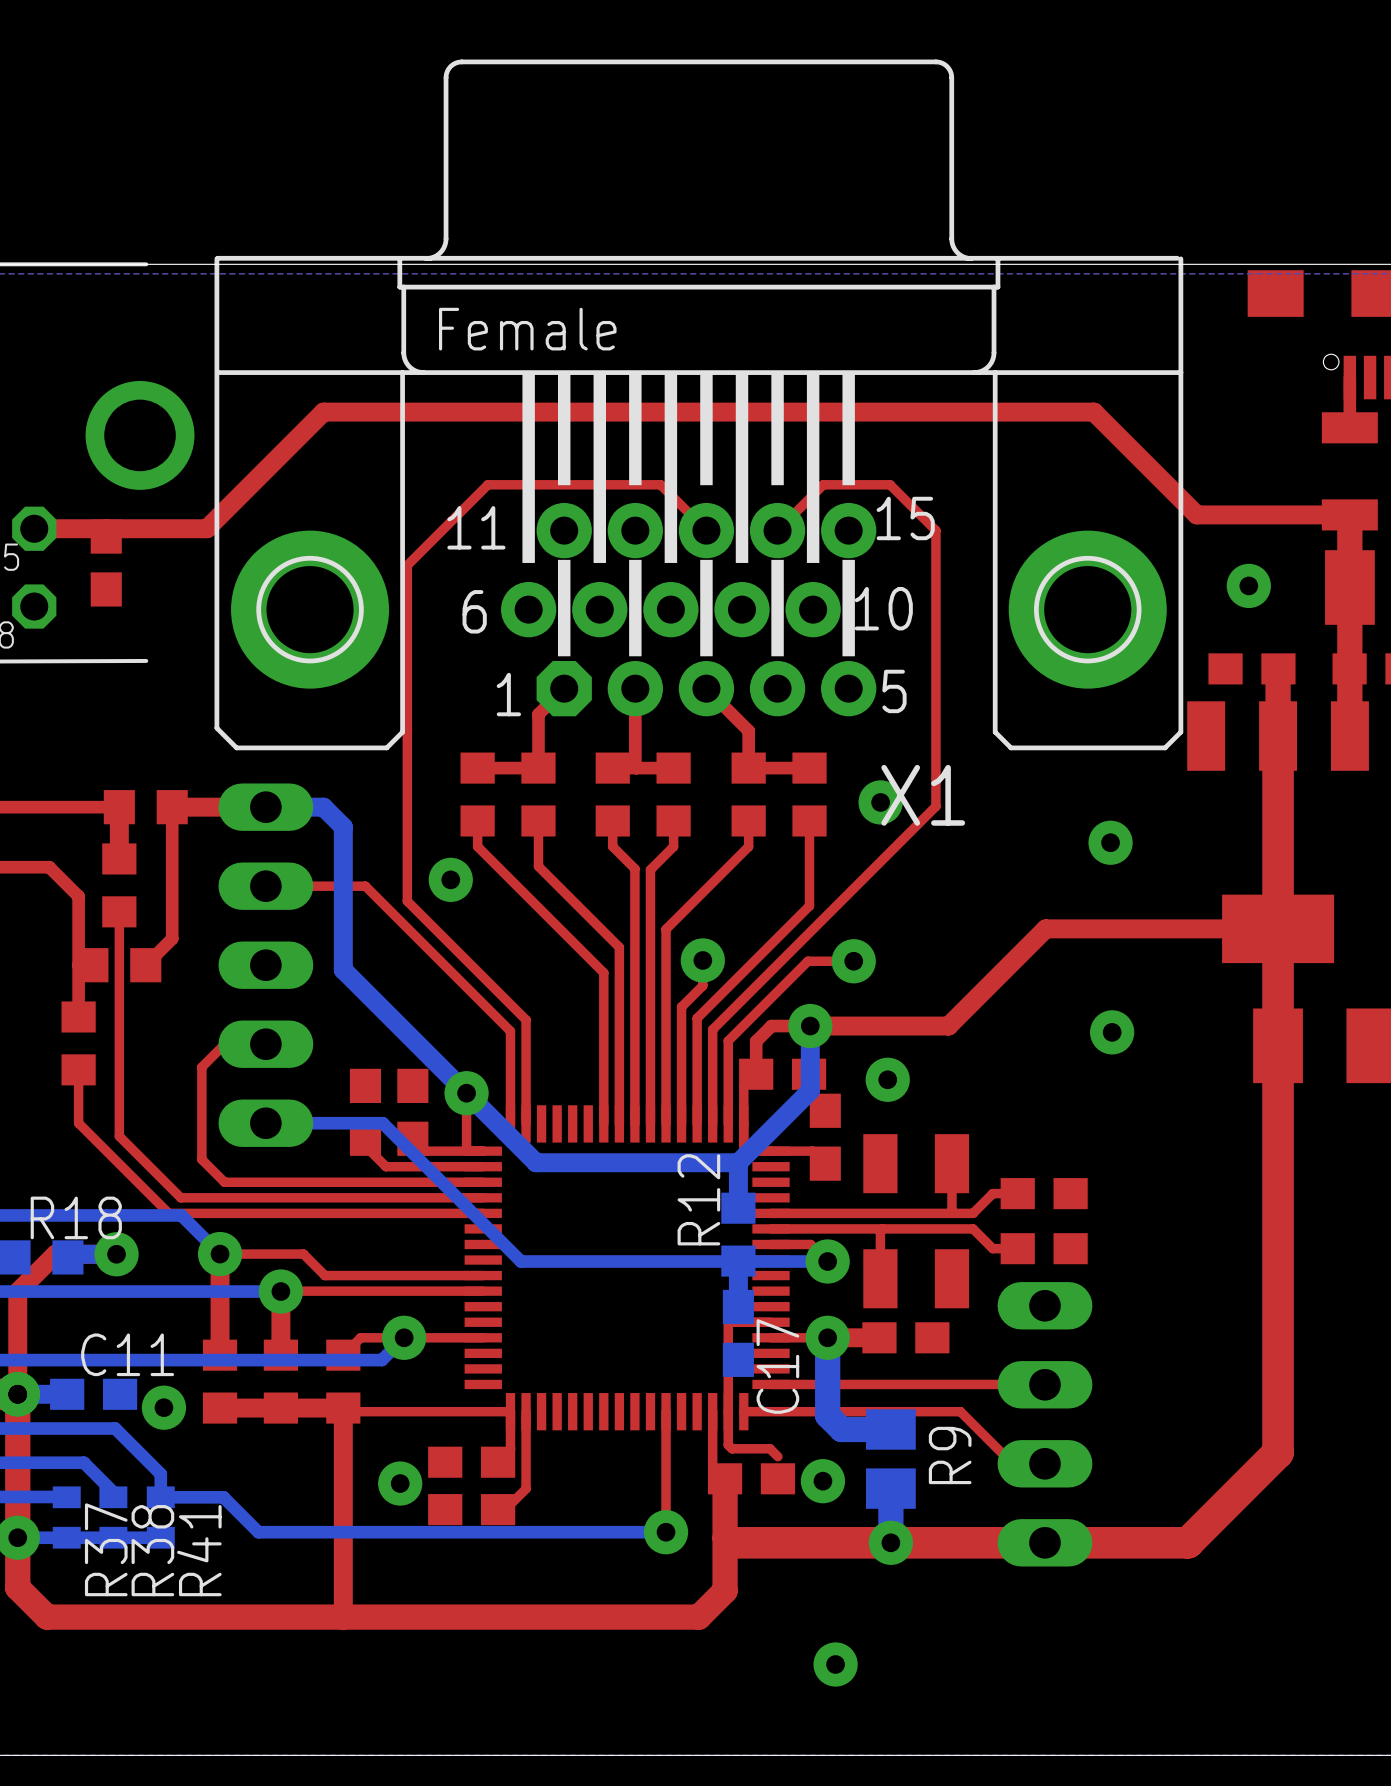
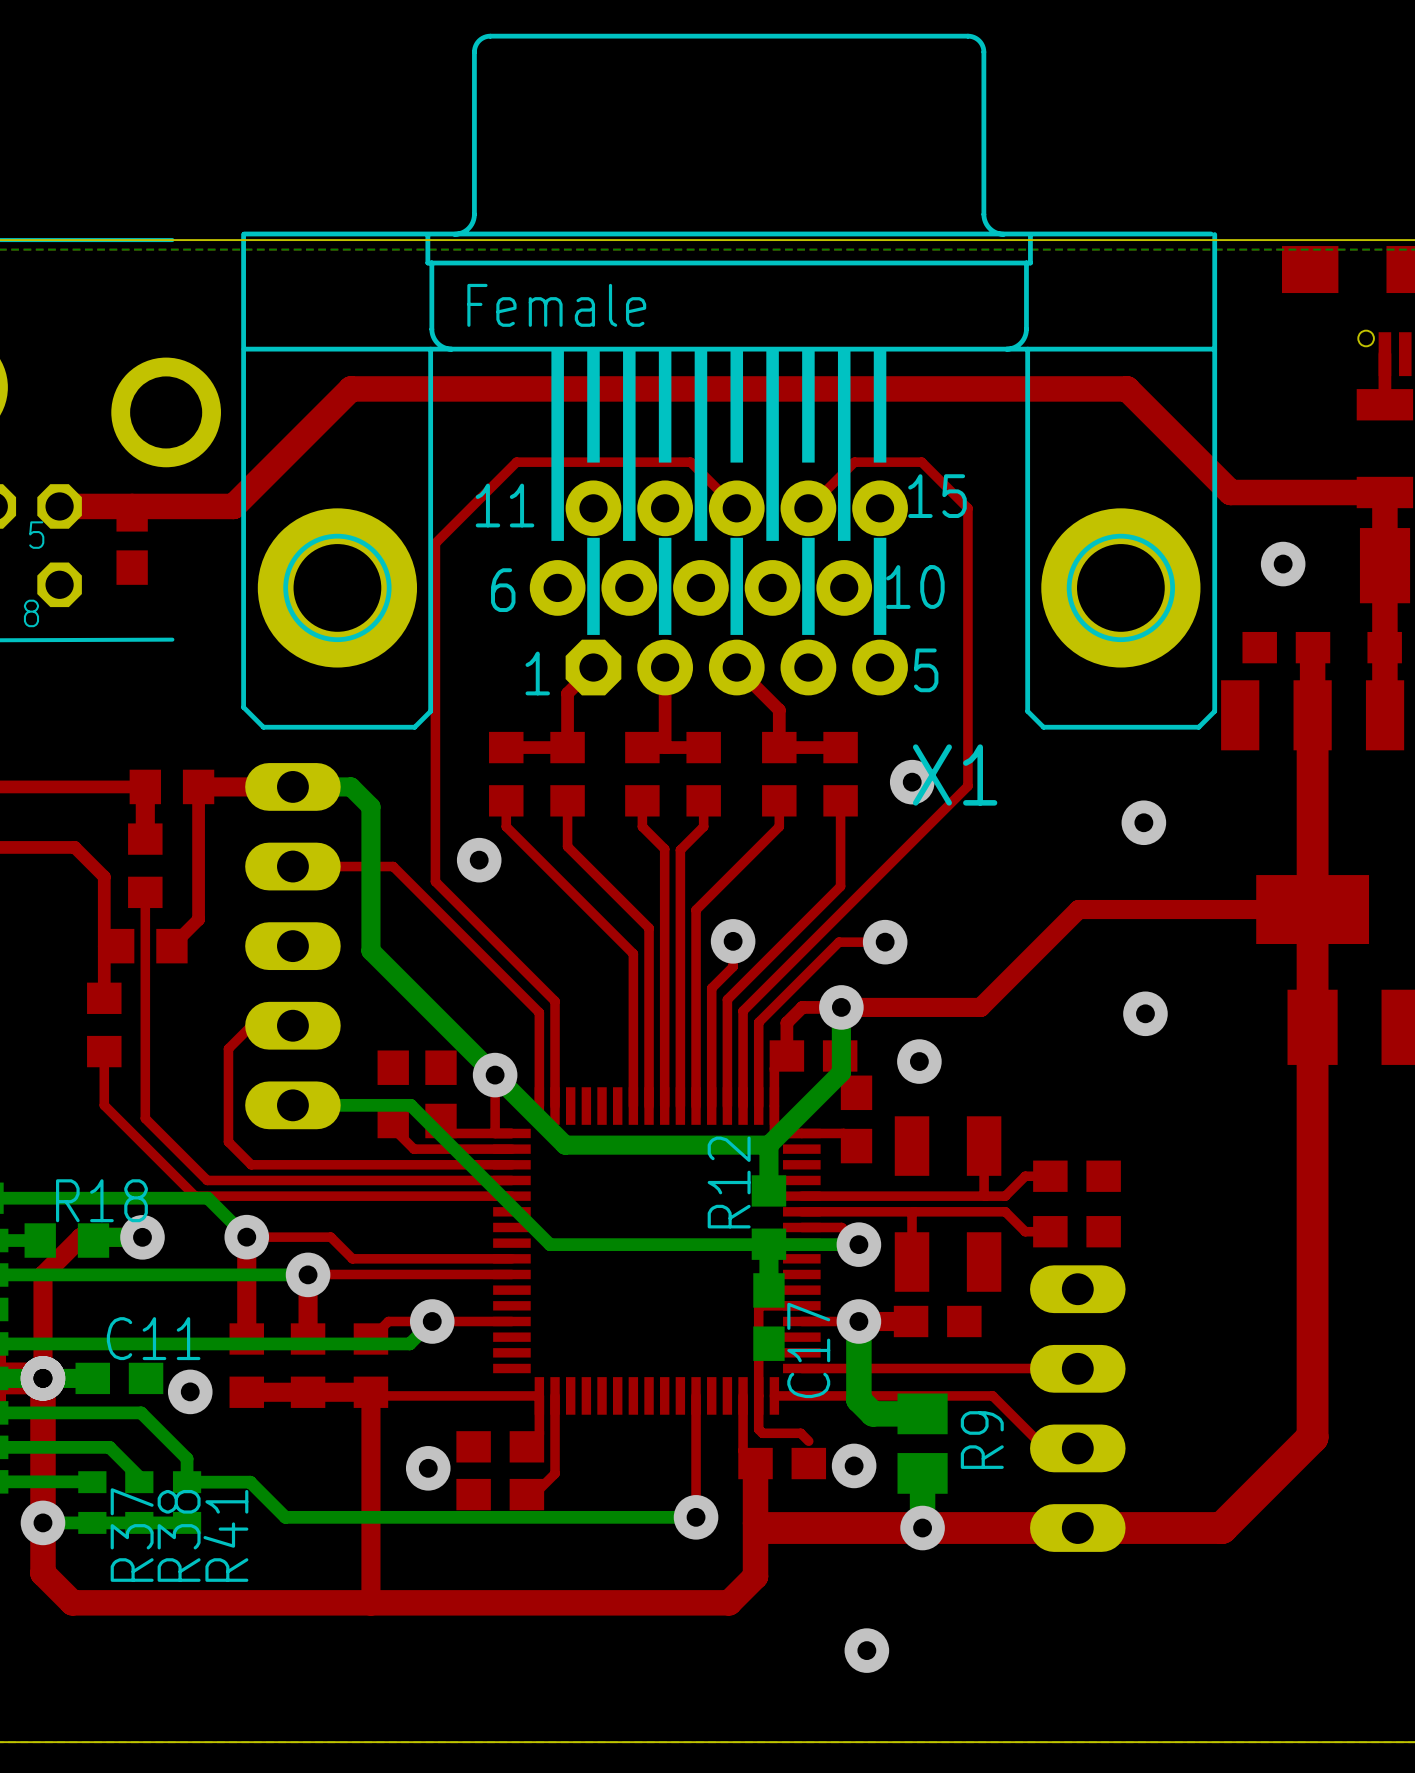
top track width: thin (1349, 514) (1196, 514) (1093, 412) (323, 412) (206, 528) (34, 528) -> thick (1384, 492) (1230, 492) (1127, 388) (351, 388) (233, 506) (59, 506)

